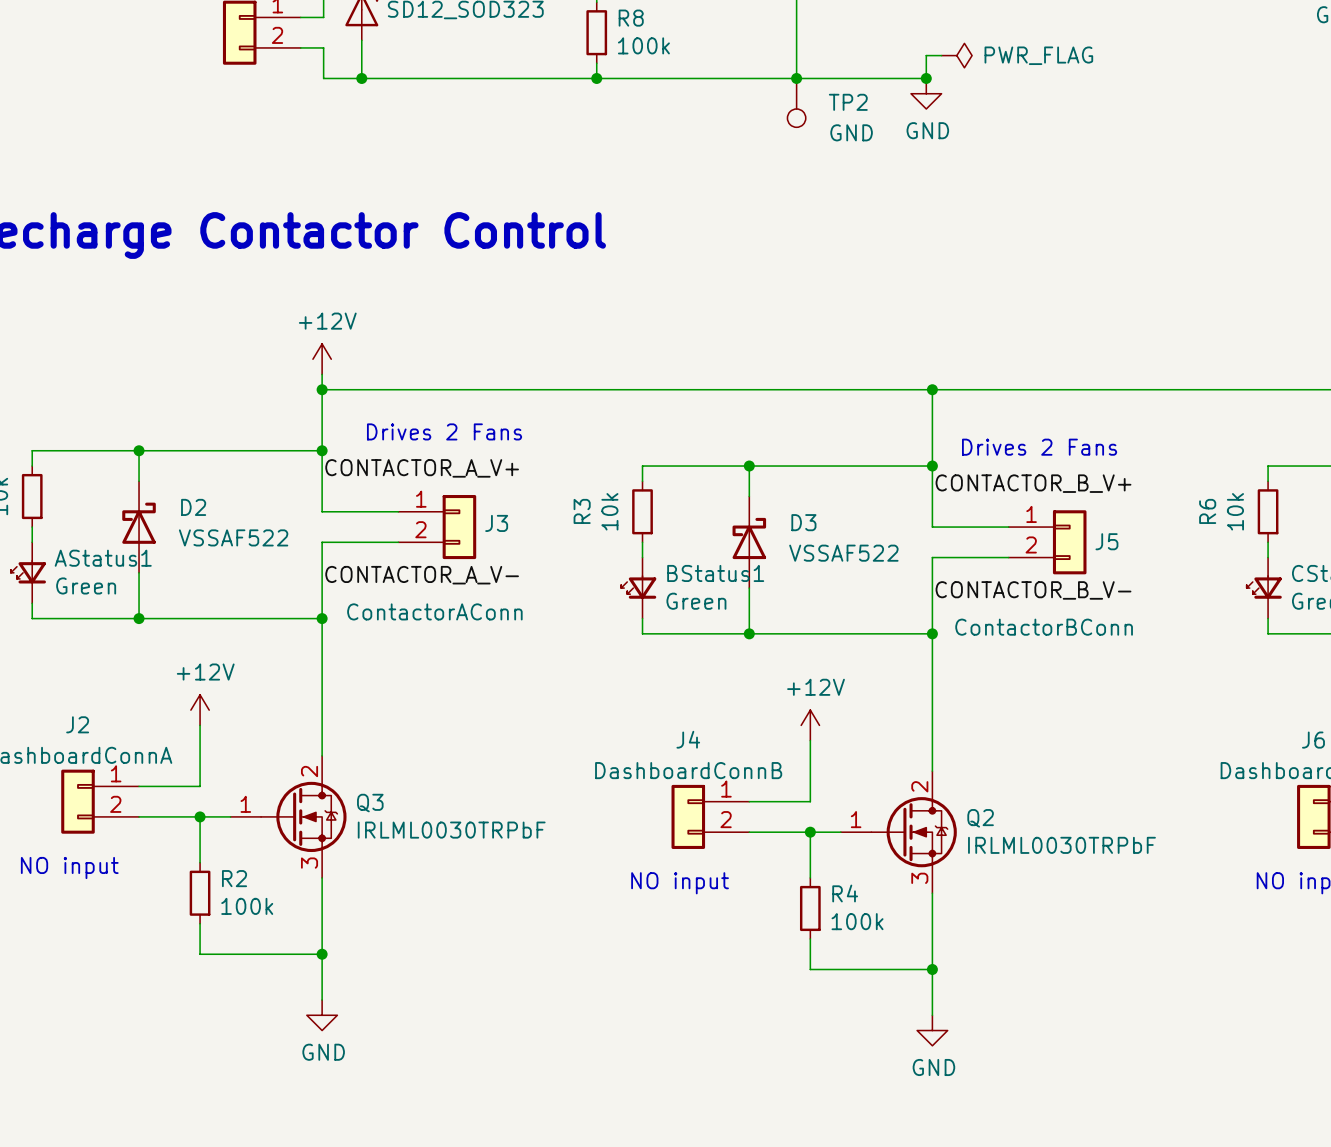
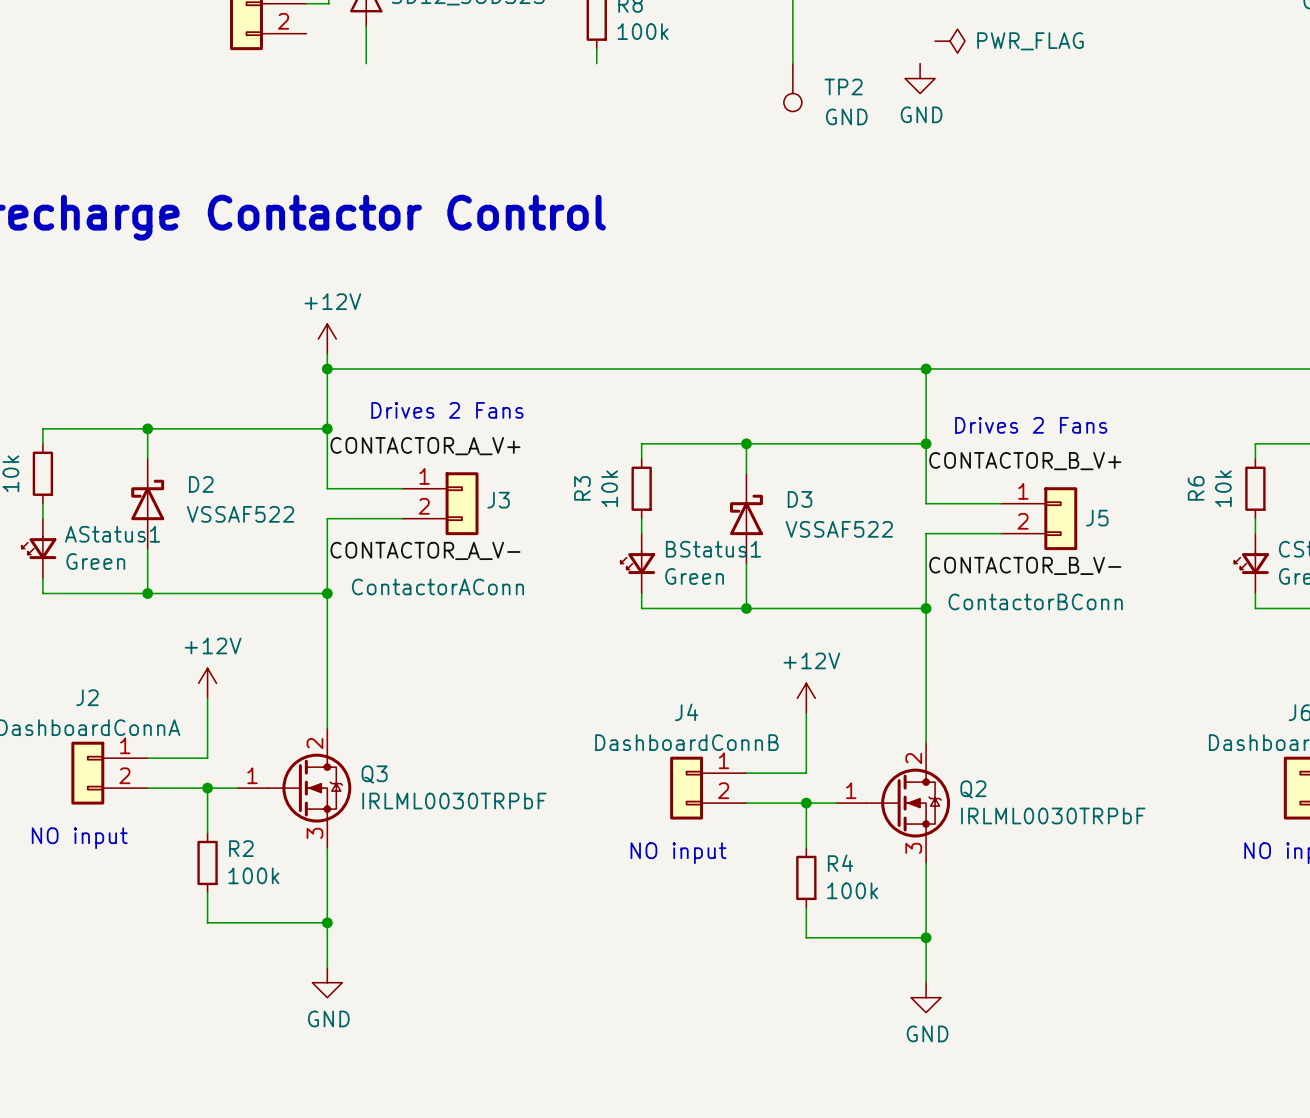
wire: (300, 47) (323, 47) (323, 78) (926, 78) (926, 55) (941, 55) -> none
junction: (361, 78) -> none
junction: (596, 78) -> none
junction: (796, 78) -> none
junction: (926, 78) -> none

